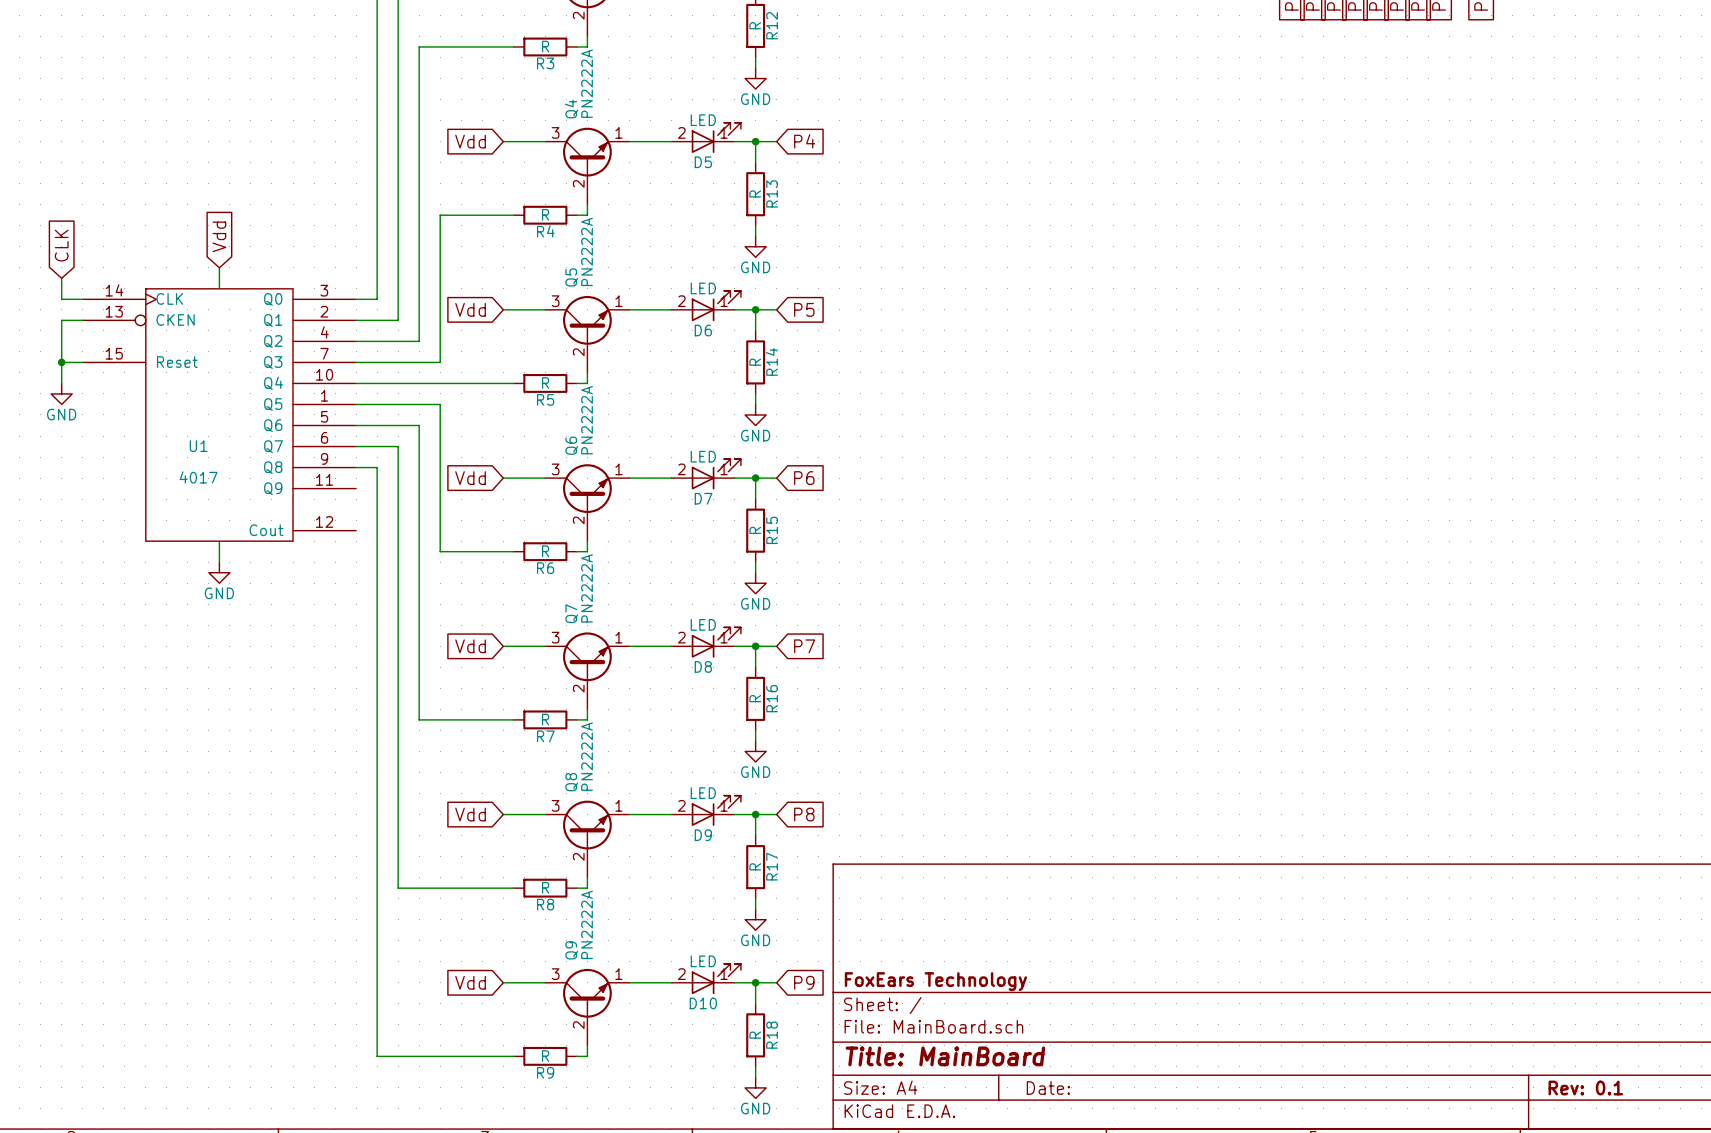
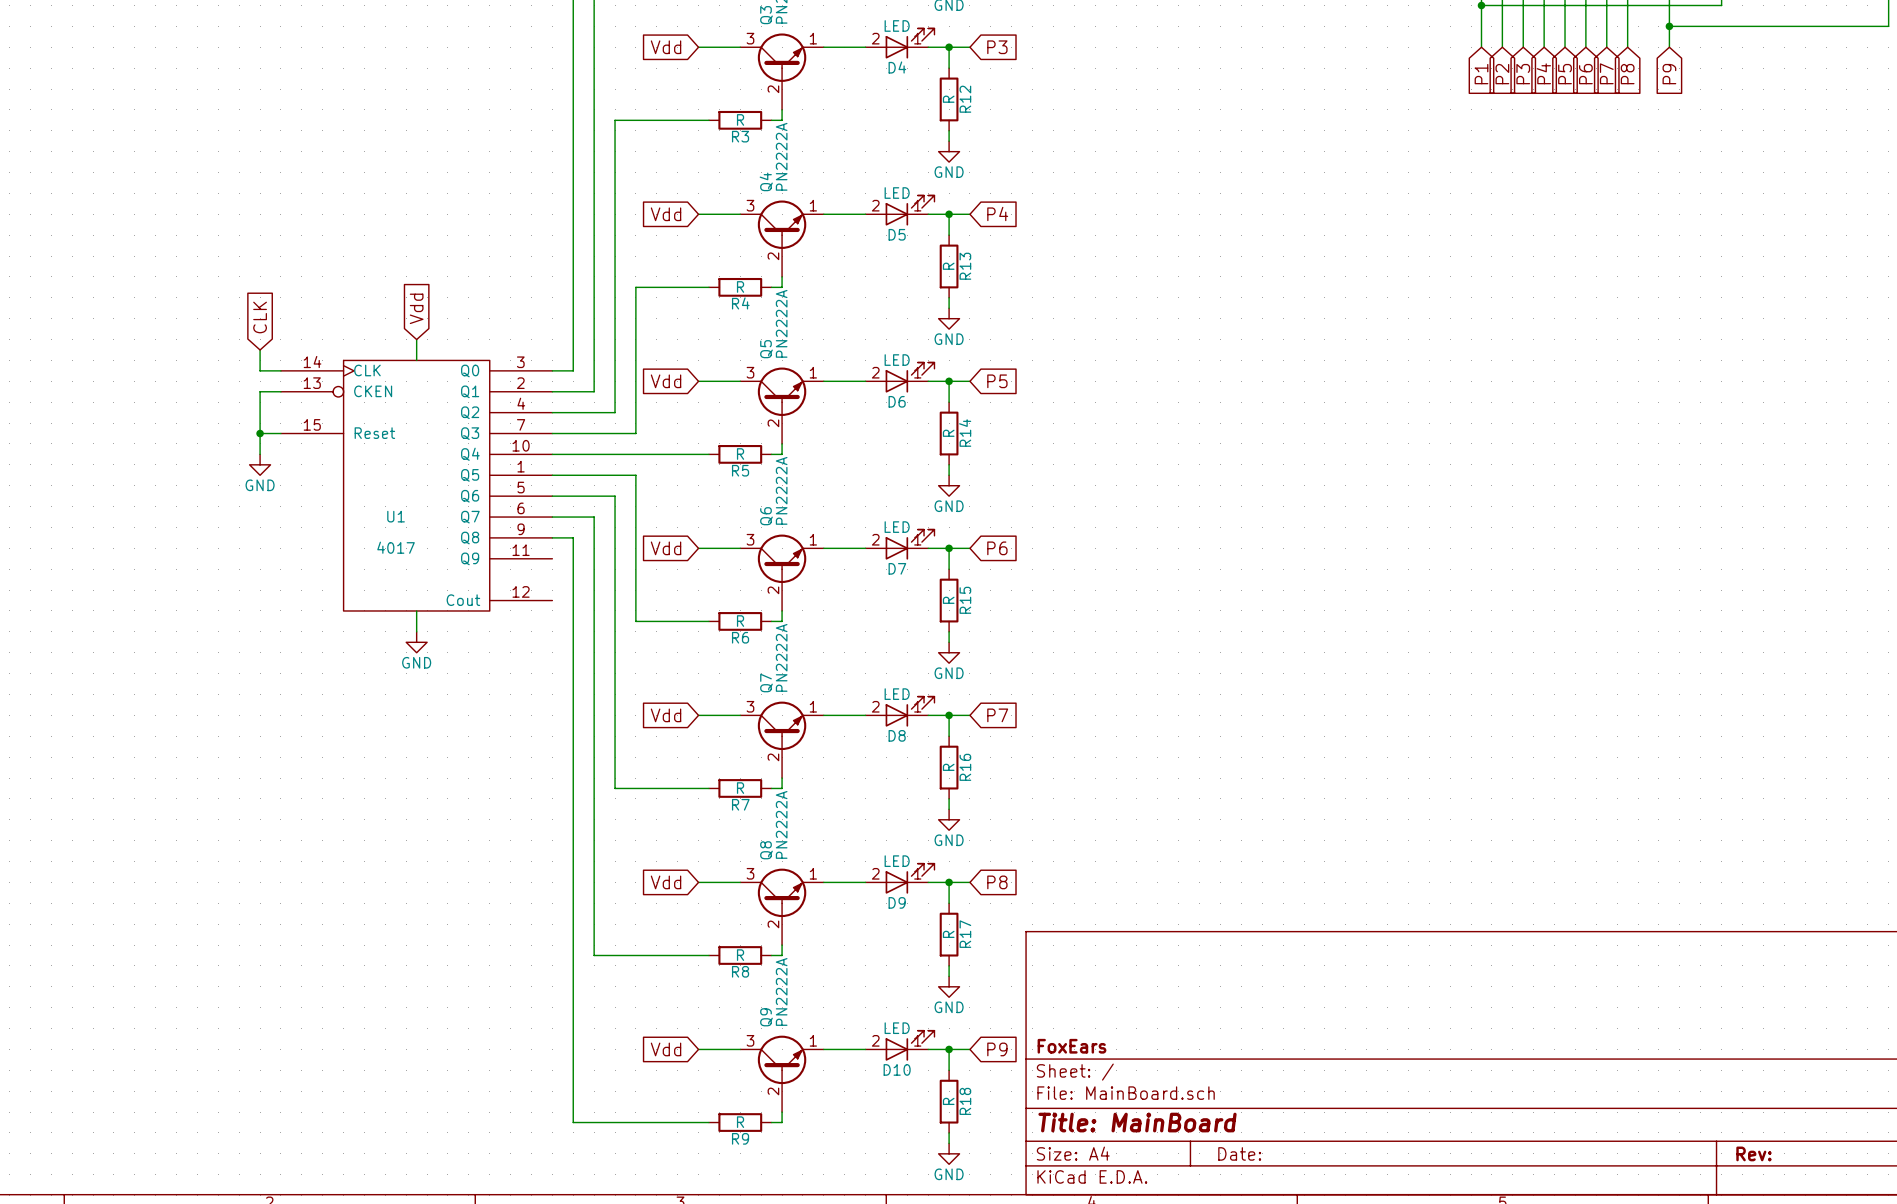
title block: FoxEars Technology (935, 981) -> FoxEars (1071, 1046)
title block: Rev: 0.1 (1585, 1088) -> Rev: (1753, 1153)

